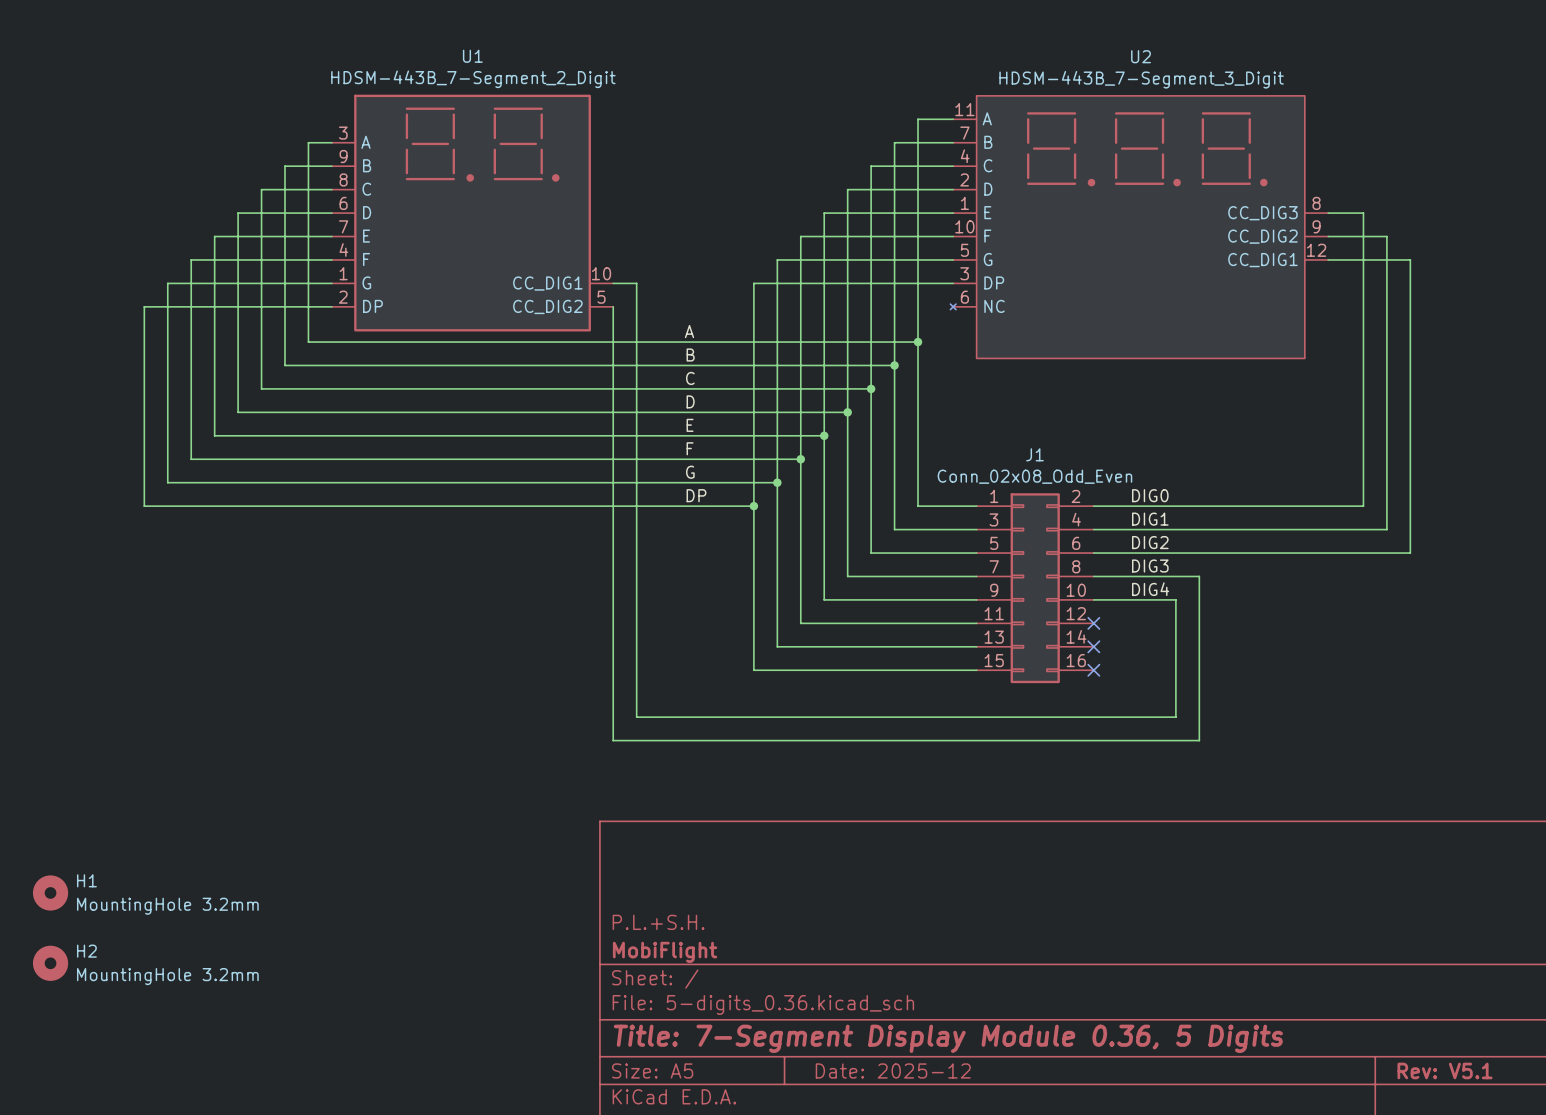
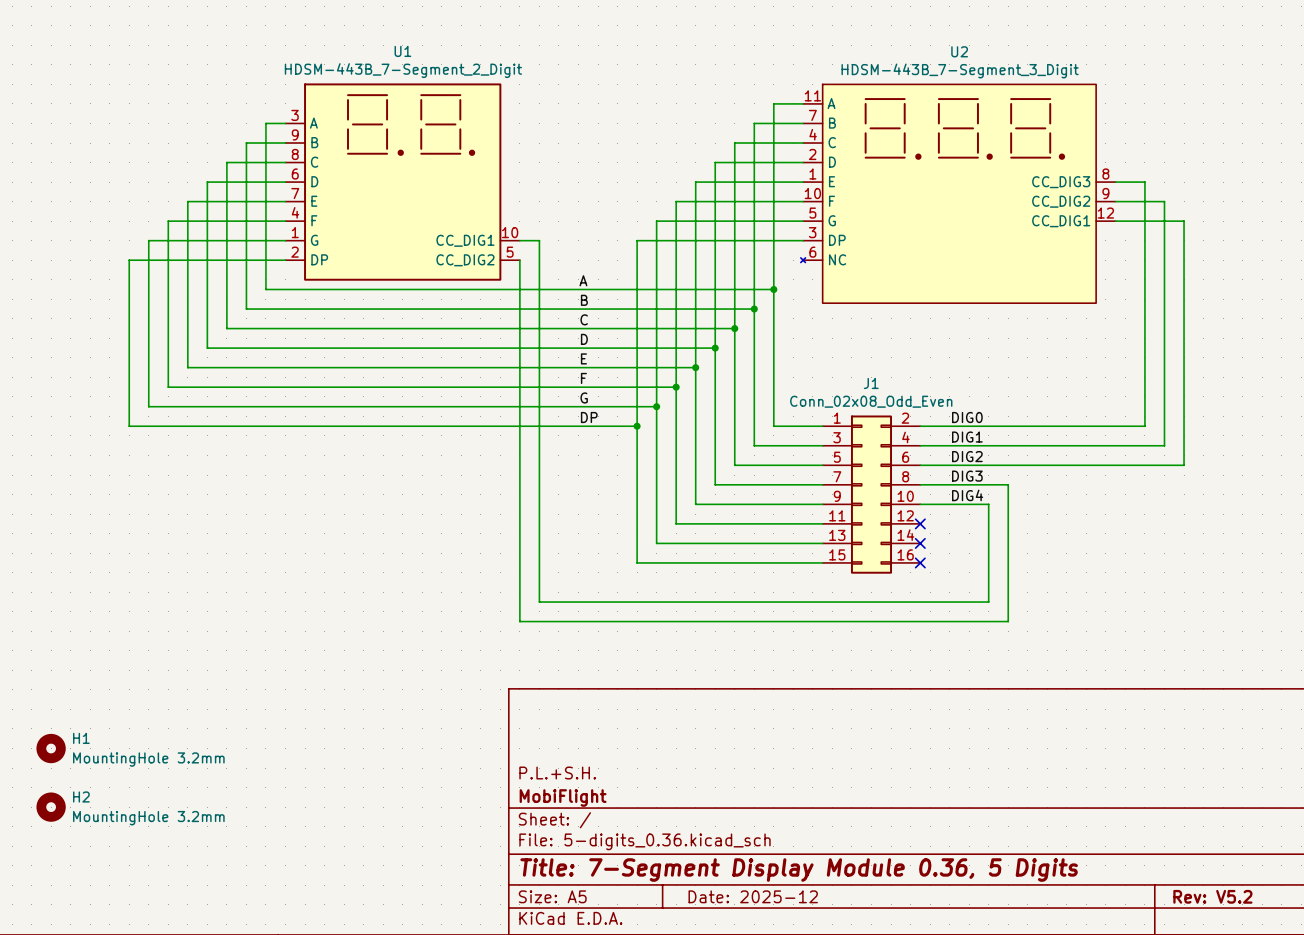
title block: Rev: V5.1 (1445, 1070) -> Rev: V5.2 (1212, 896)

